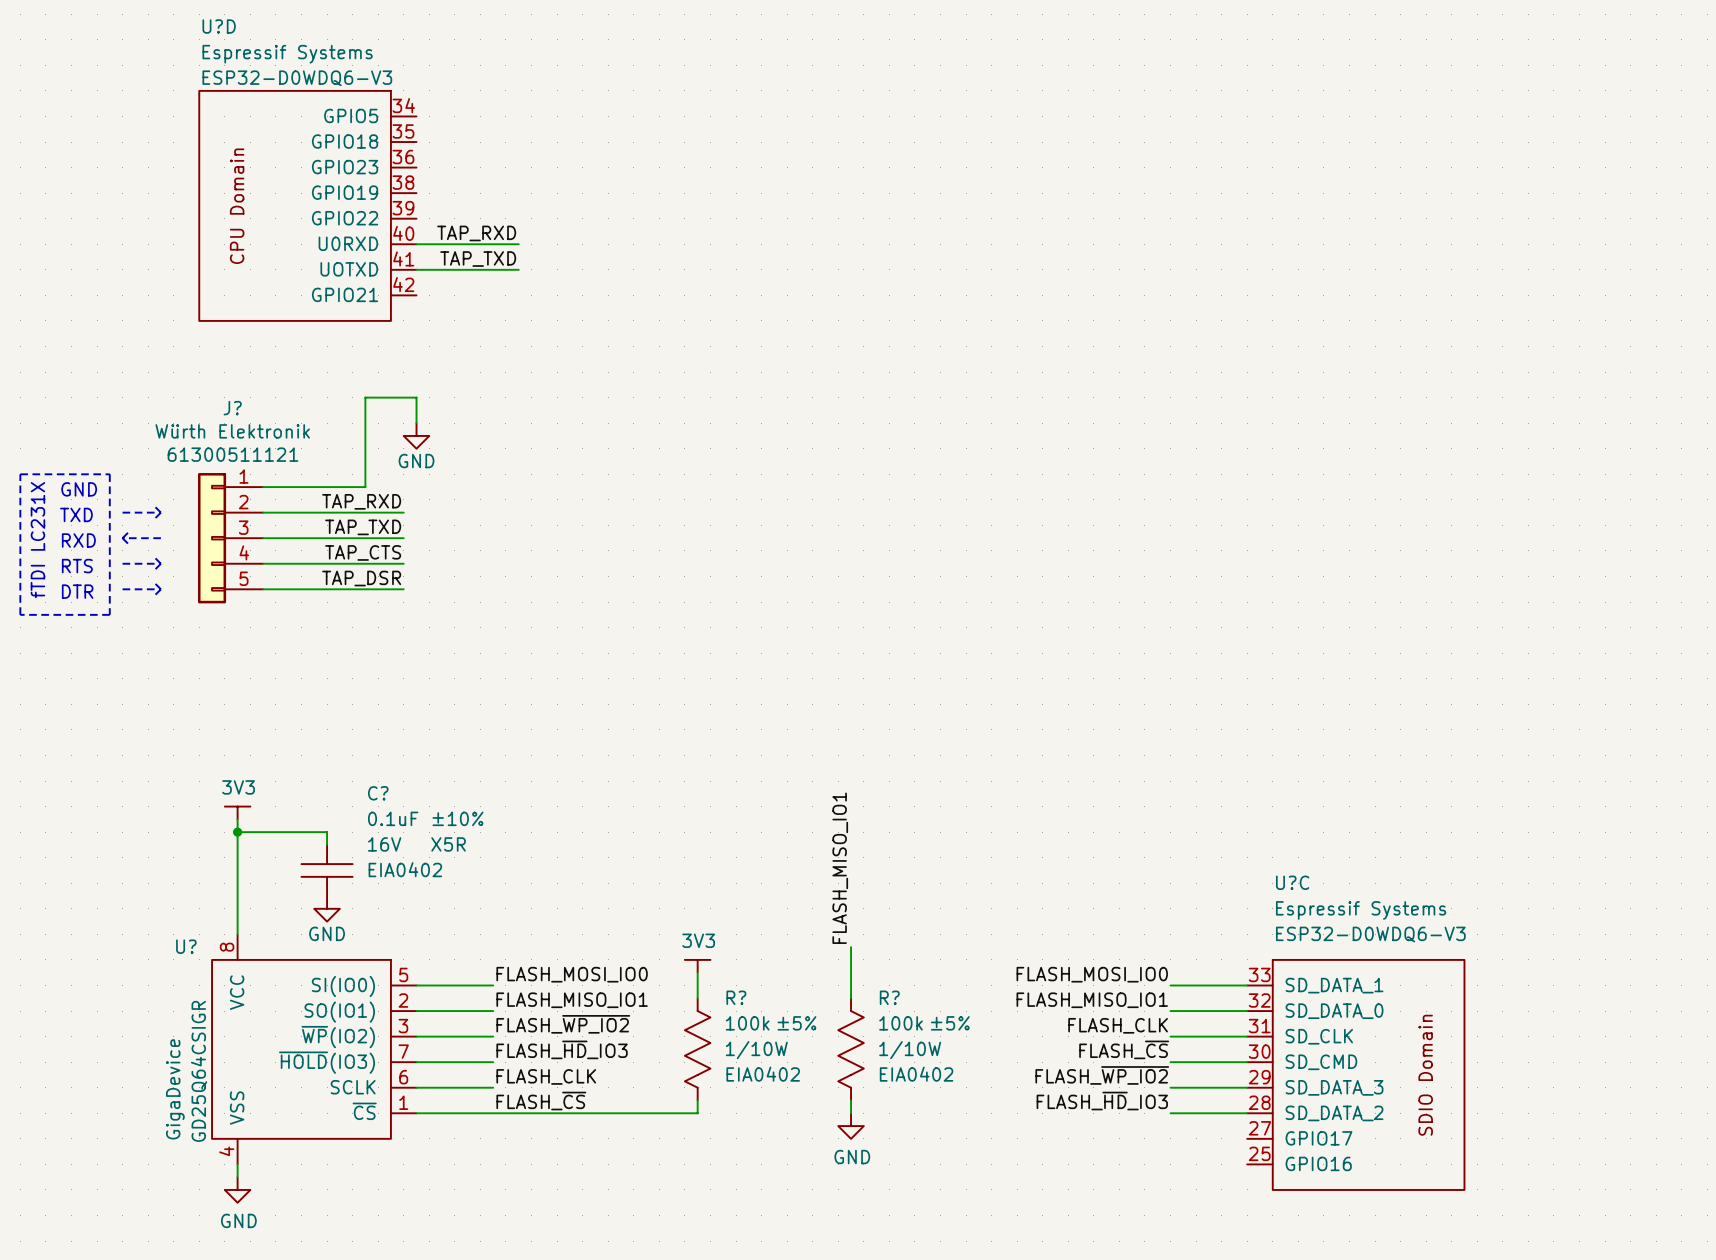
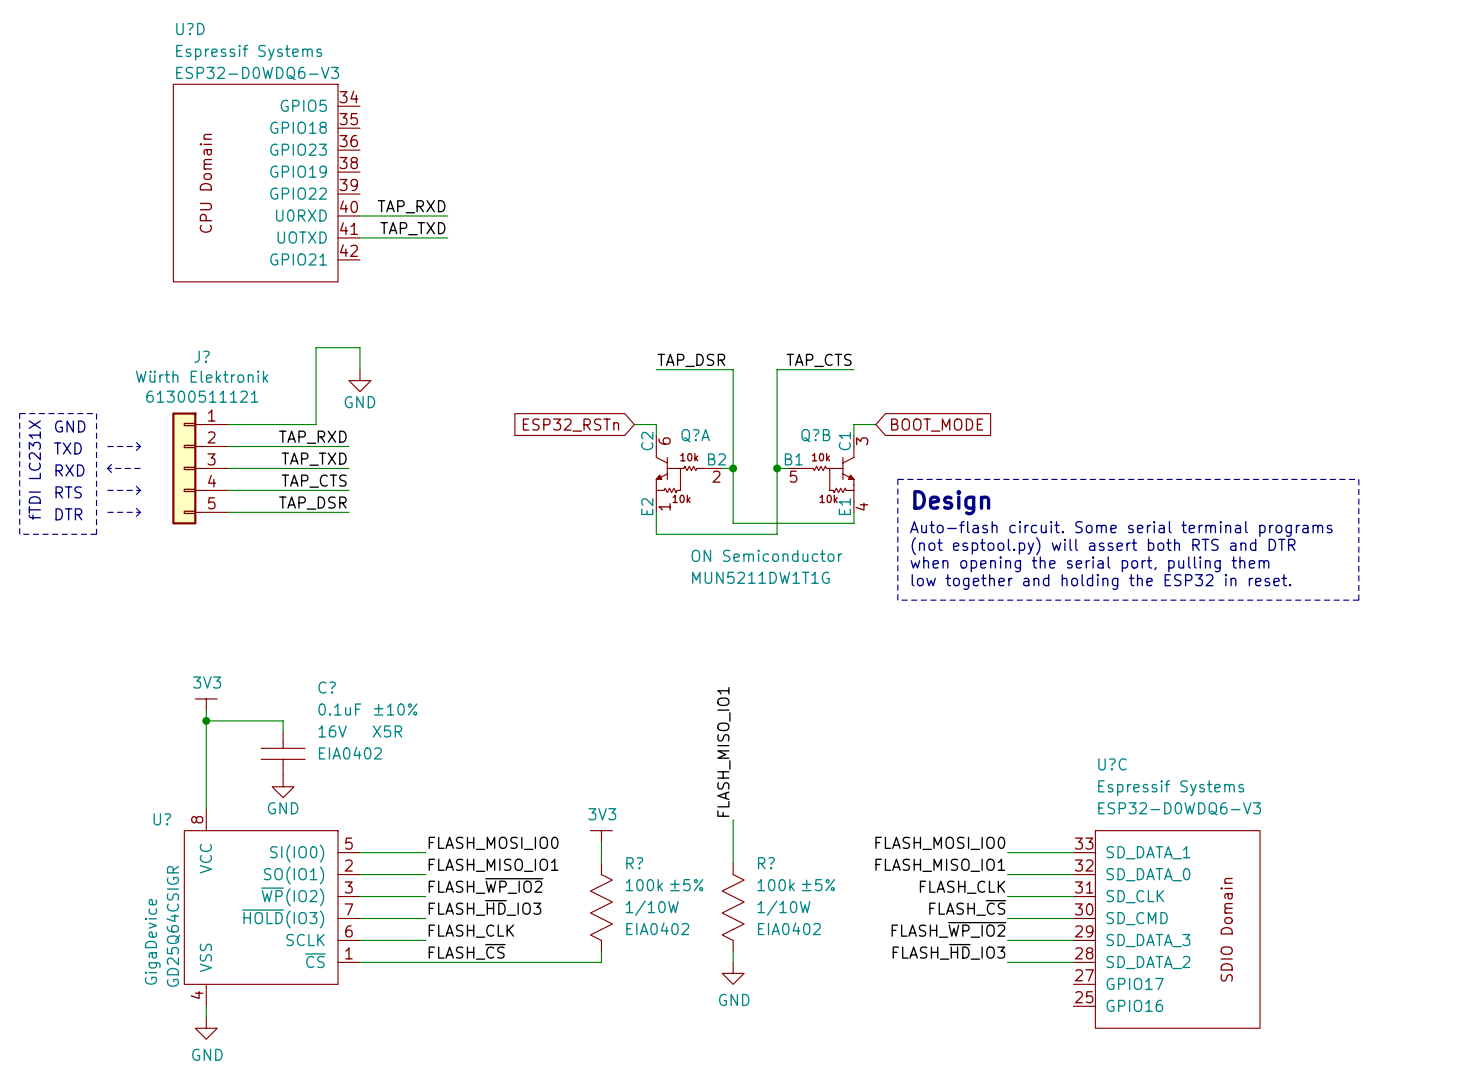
label: none -> TAP_DSR (691, 360)
label: none -> TAP_CTS (819, 360)
wire: none -> (656, 369) (733, 369) (733, 523) (853, 523) (853, 512)
wire: none -> (853, 369) (777, 369) (777, 534) (656, 534) (656, 512)
global label: none -> ESP32_RSTn (570, 425)
wire: none -> (634, 424) (656, 424) (656, 435)
wire: none -> (875, 424) (853, 424) (853, 435)
global label: none -> BOOT_MODE (937, 425)
wire: none -> (722, 468) (733, 468)
junction: none -> (733, 468)
wire: none -> (777, 468) (788, 468)
junction: none -> (777, 468)
Q?A: none -> (689, 473)
Q?B: none -> (820, 473)
line: none -> (897, 479) (897, 600) (1358, 600) (1358, 479) (897, 479)
text: none -> Design (951, 502)
text: none -> Auto-flash circuit. Some serial terminal programs (1121, 529)
text: none -> (not esptool.py) will assert both RTS and DTR (1103, 546)
text: none -> when opening the serial port, pulling them (1089, 564)
text: none -> low together and holding the ESP32 in reset. (1101, 582)

